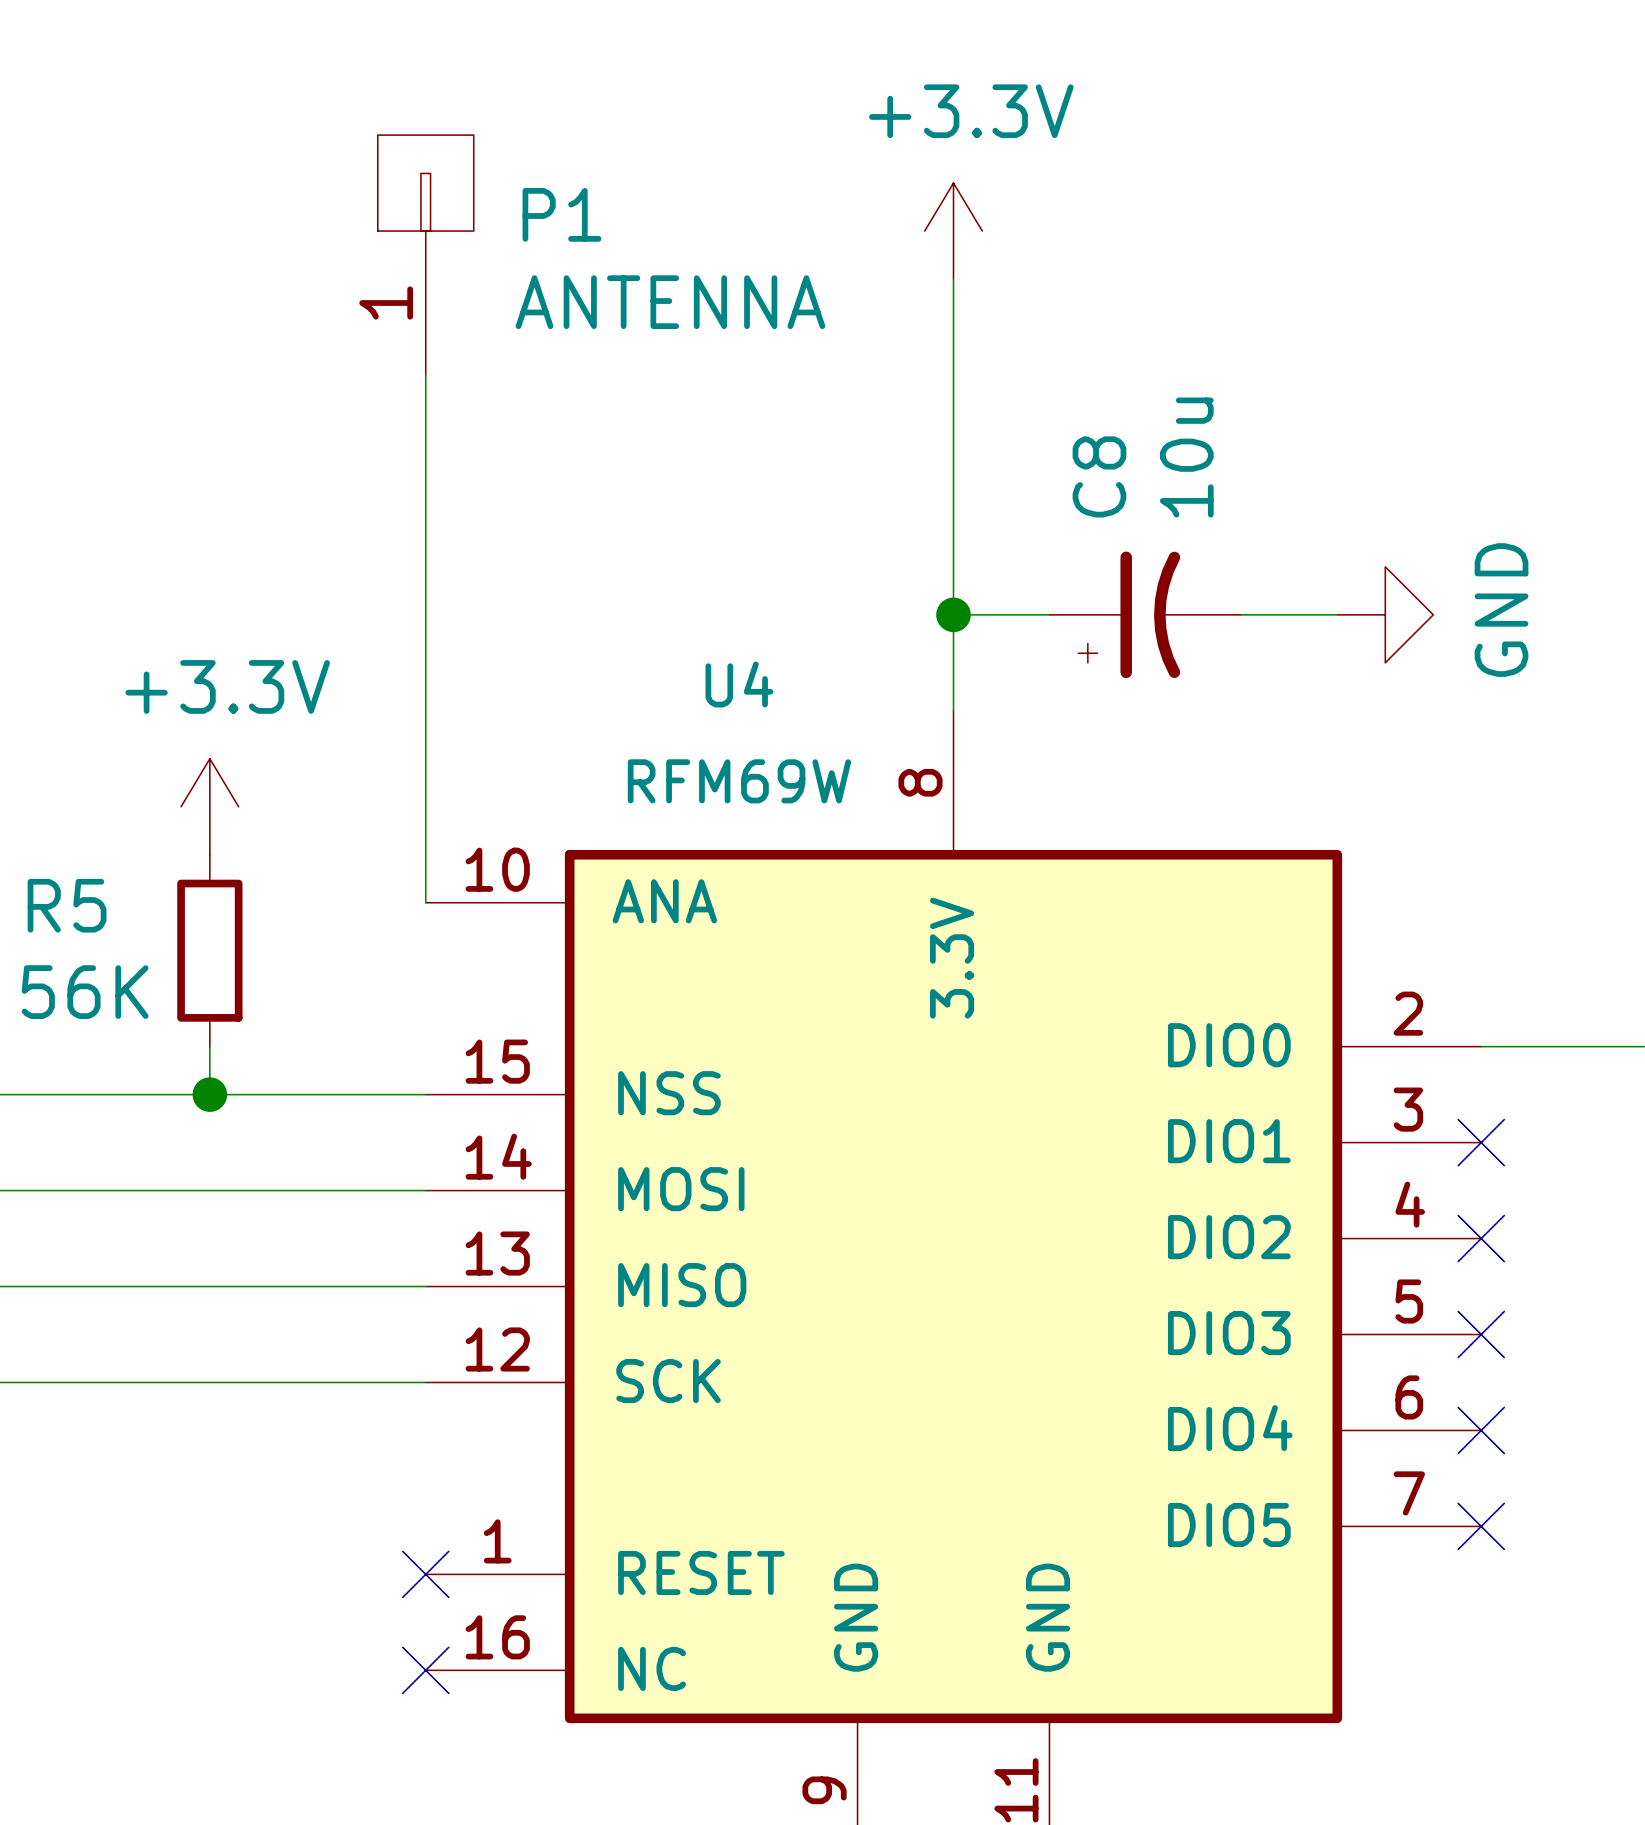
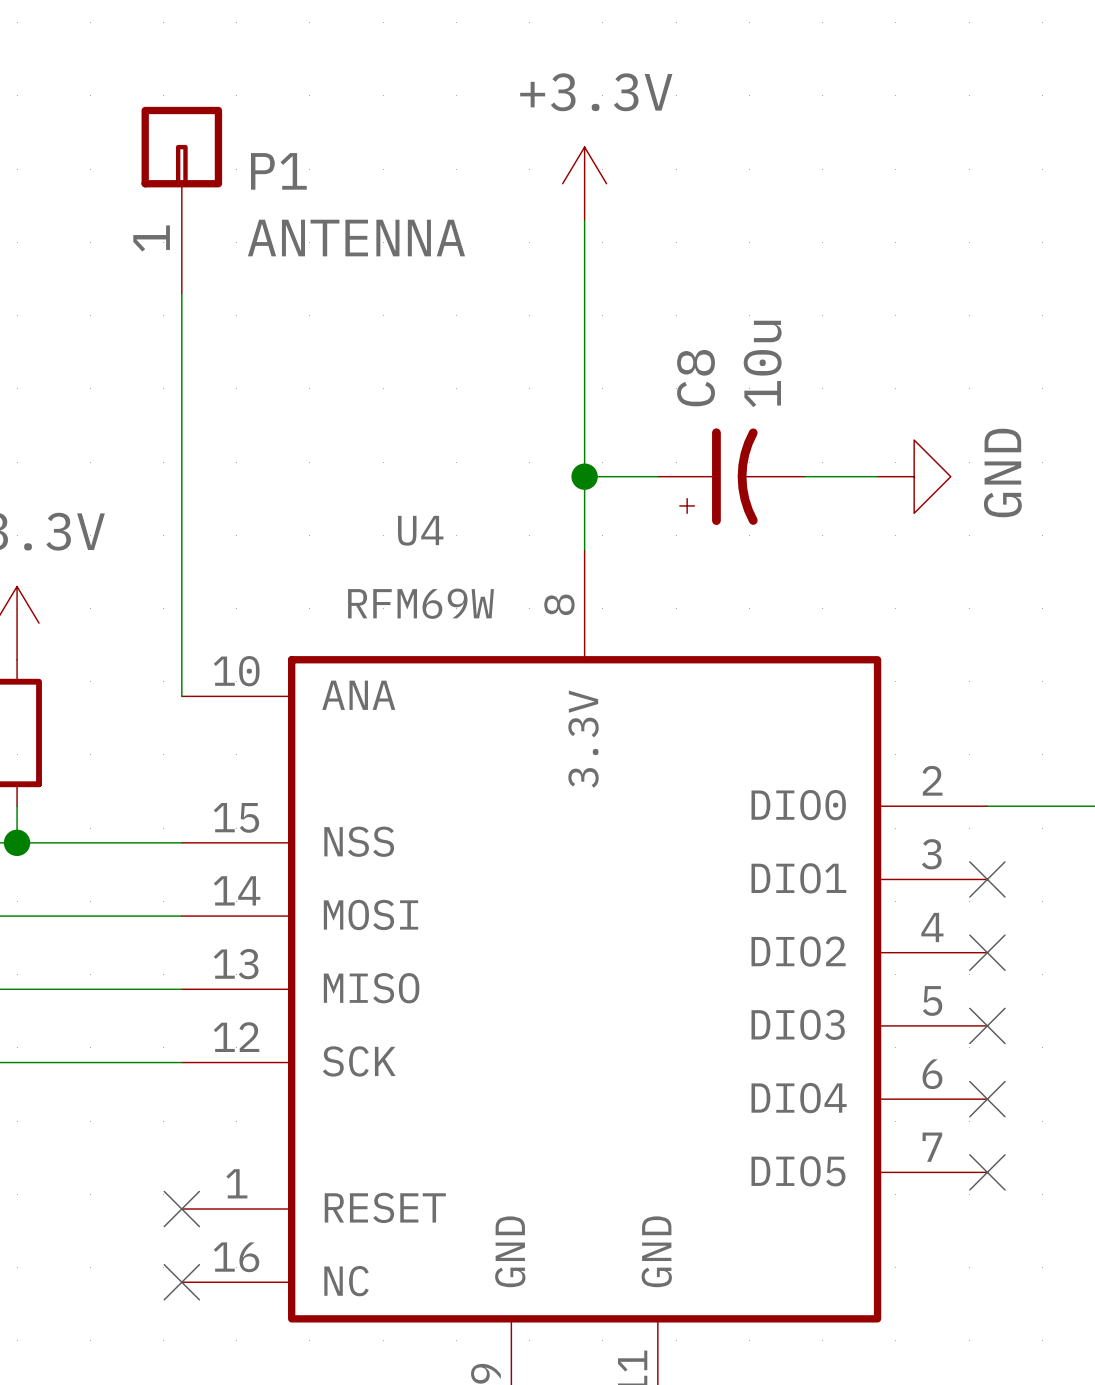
P1 symbol: [377, 135, 474, 375] -> [141, 106, 223, 294]

